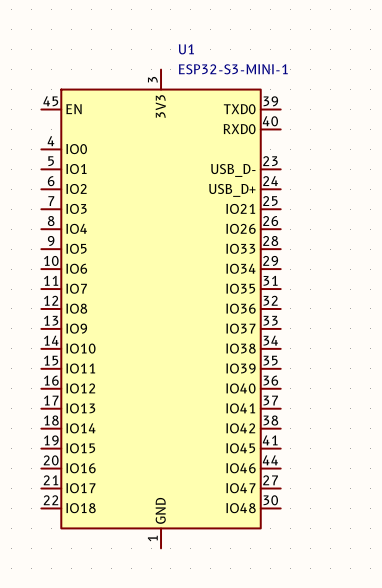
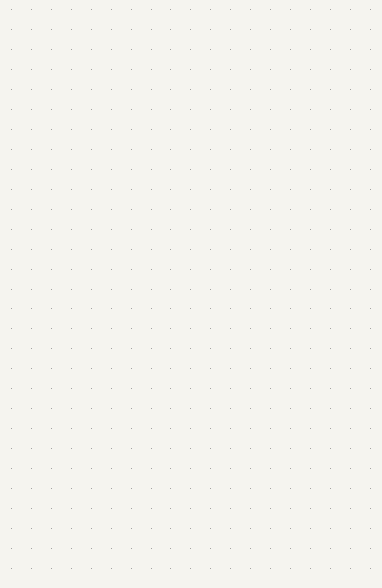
U1: ESP32-S3-MINI-1 (161, 308) -> none

